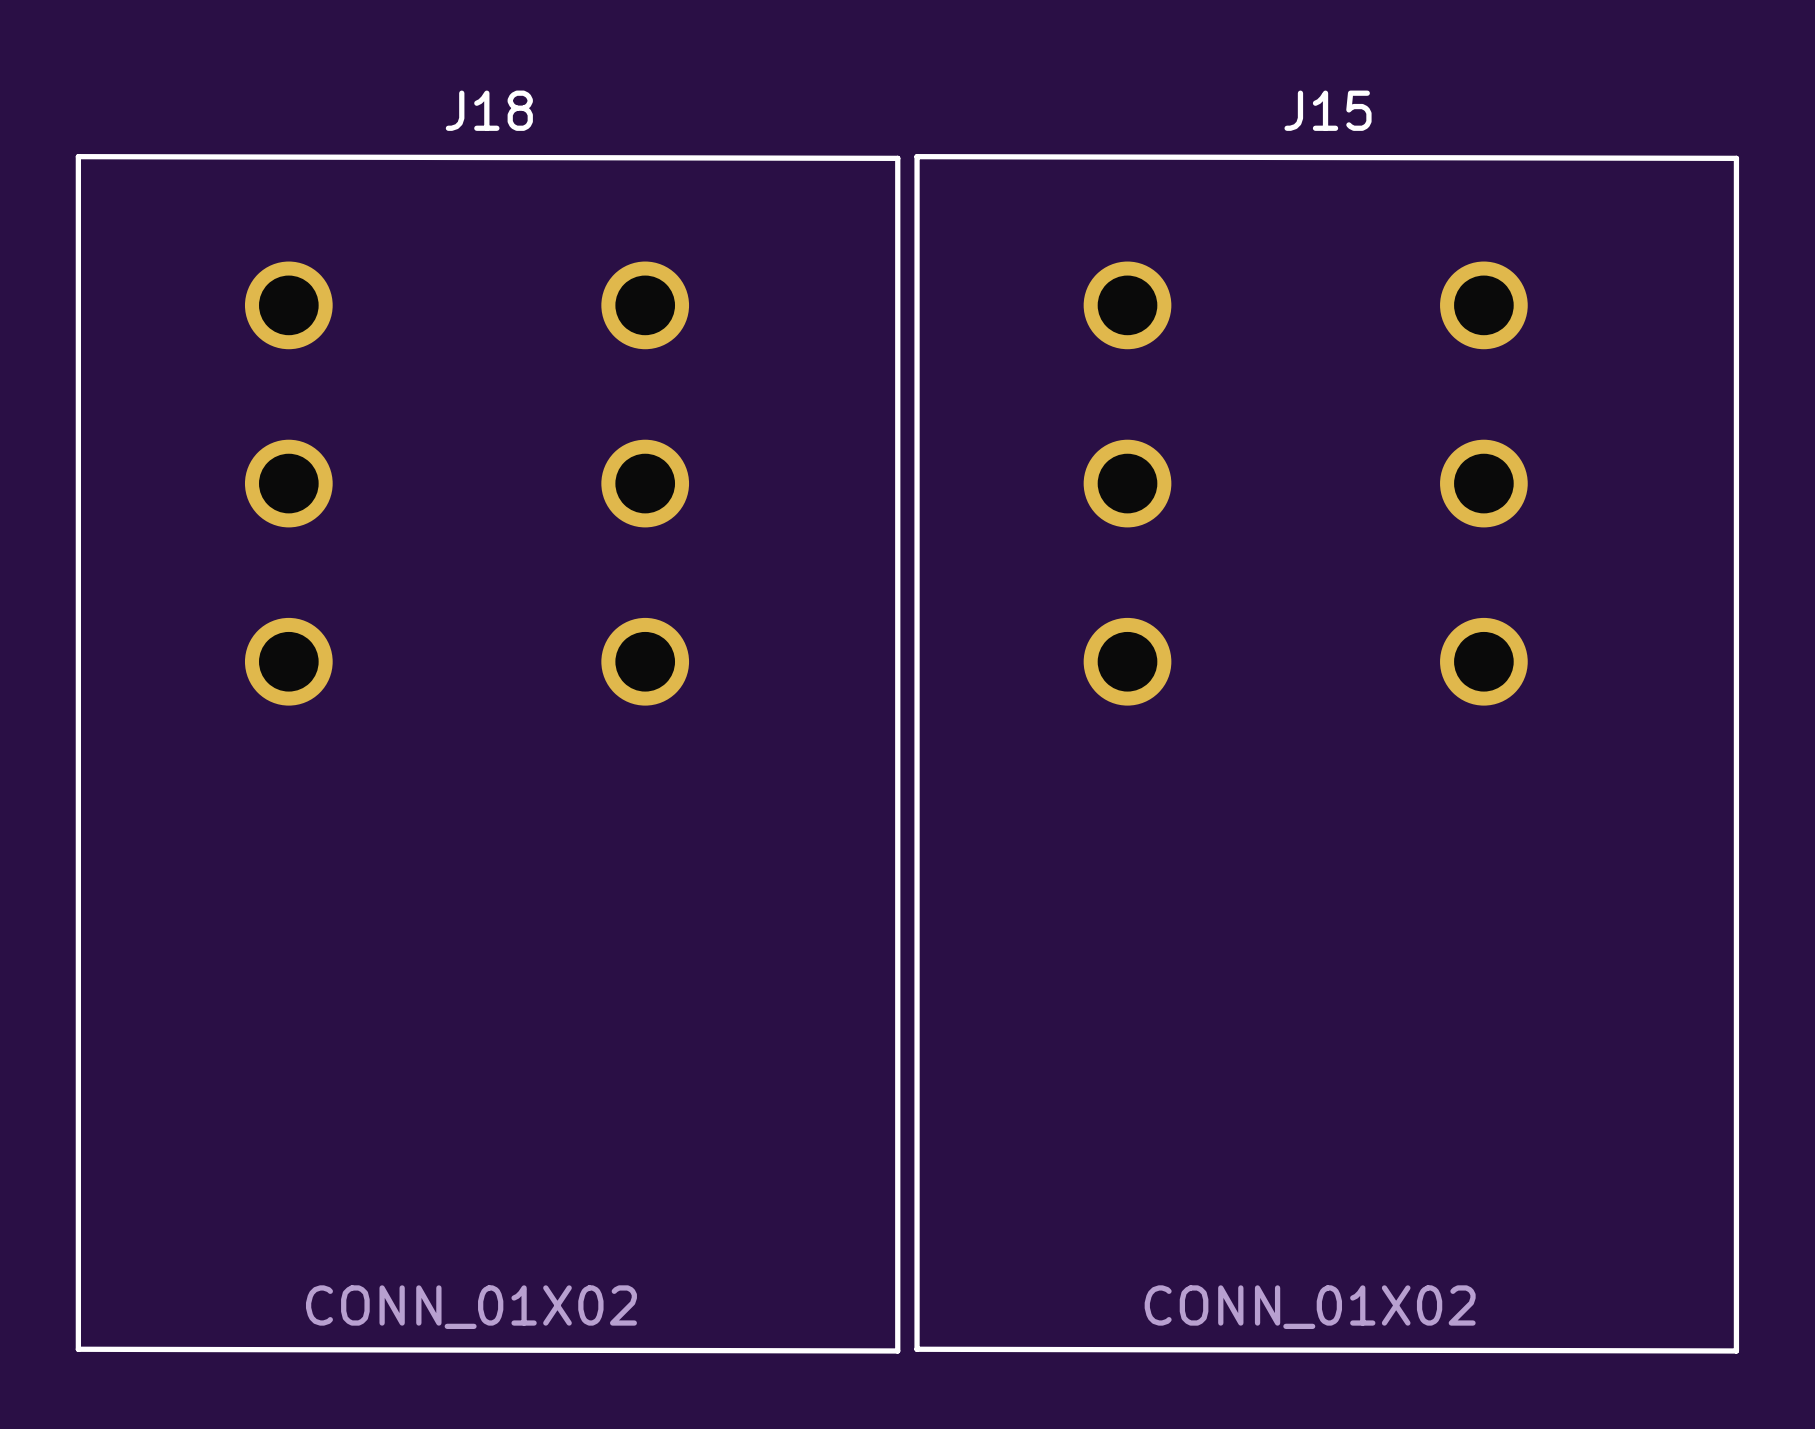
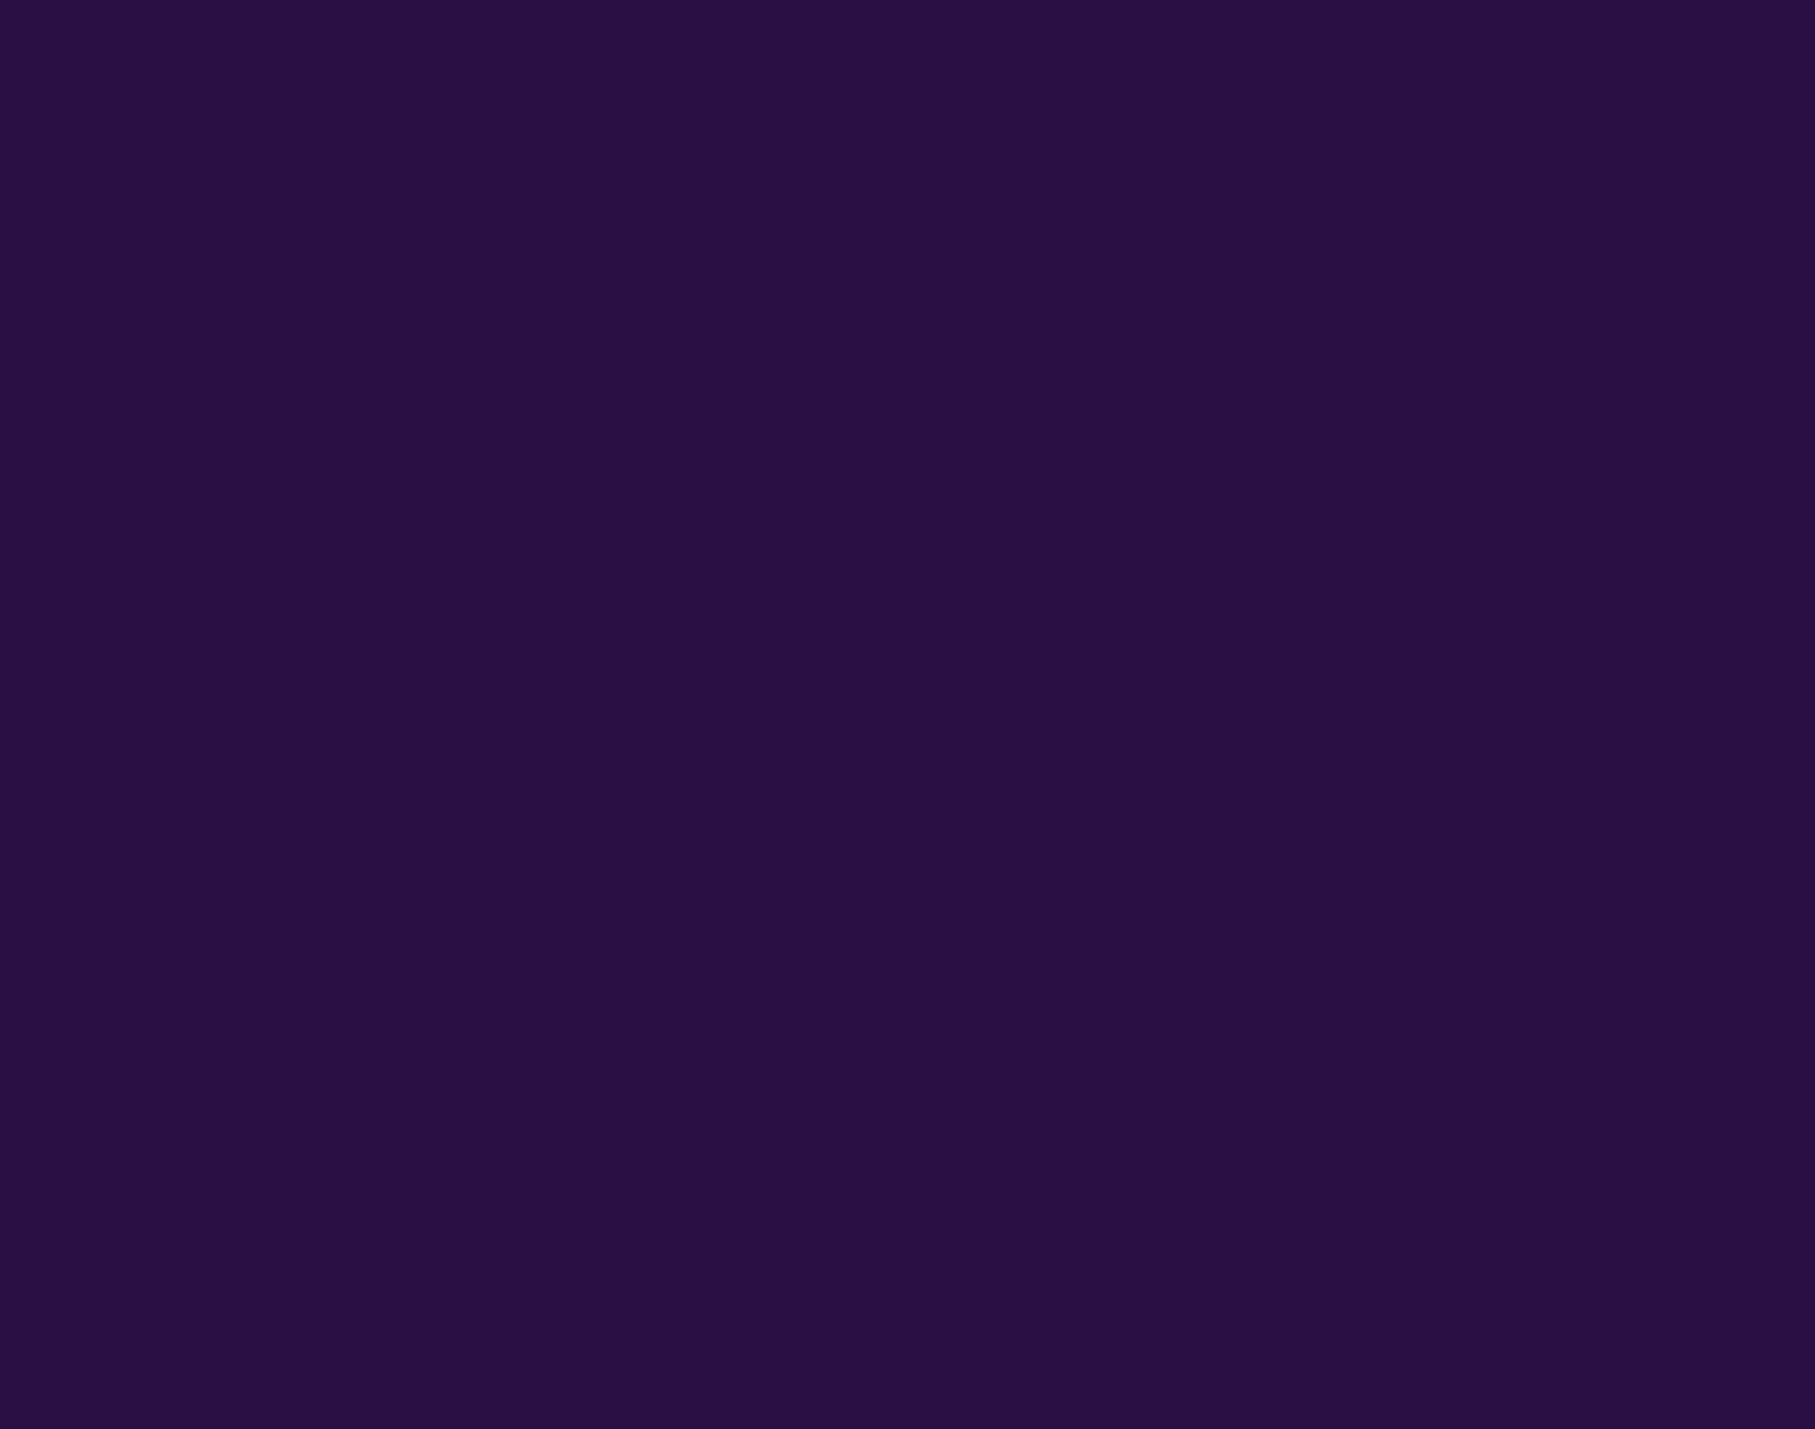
J18: CONN_01X02 (488, 753) -> none
J15: CONN_01X02 (1326, 753) -> none

